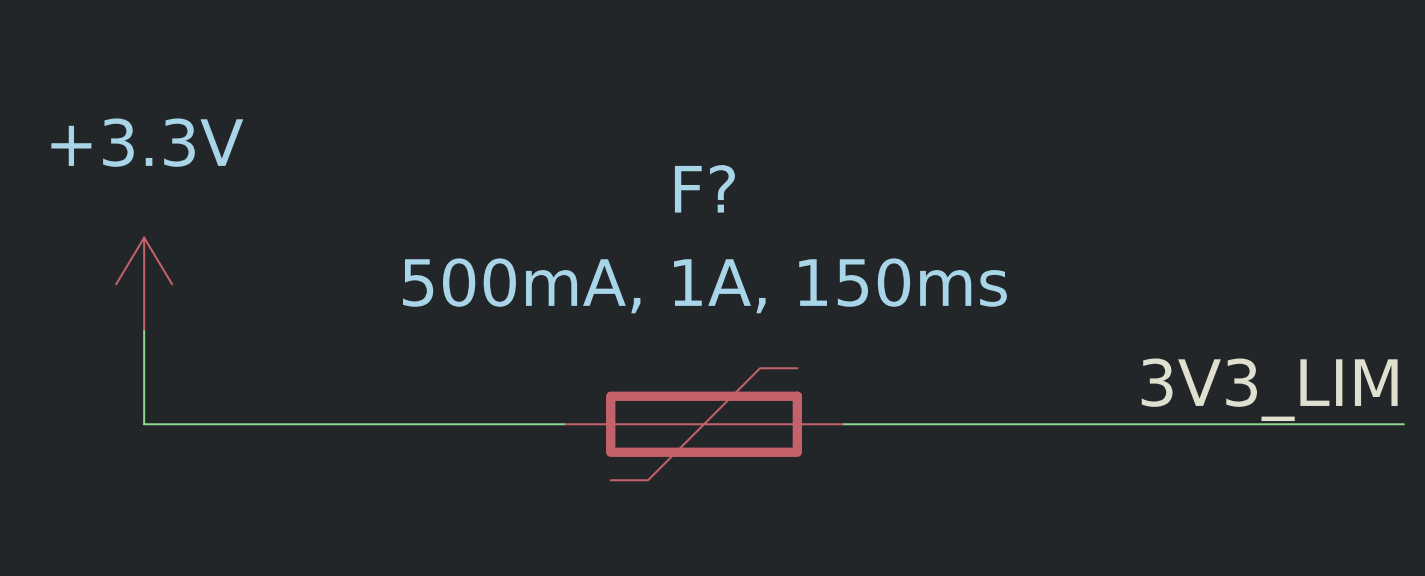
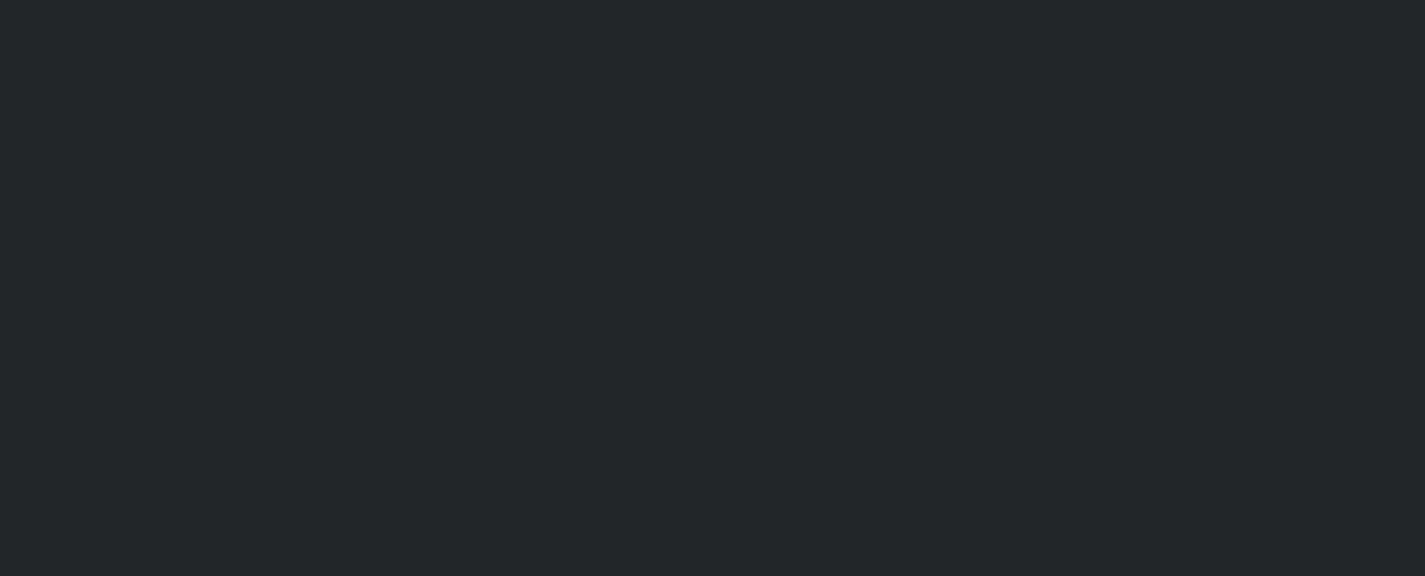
power symbol: +3.3V (144, 284) -> none
wire: (144, 330) (144, 424) (564, 424) -> none
label: 3V3_LIM (1269, 389) -> none
F?: 500mA, 1A, 150ms (704, 424) -> none
wire: (843, 424) (1403, 424) -> none

